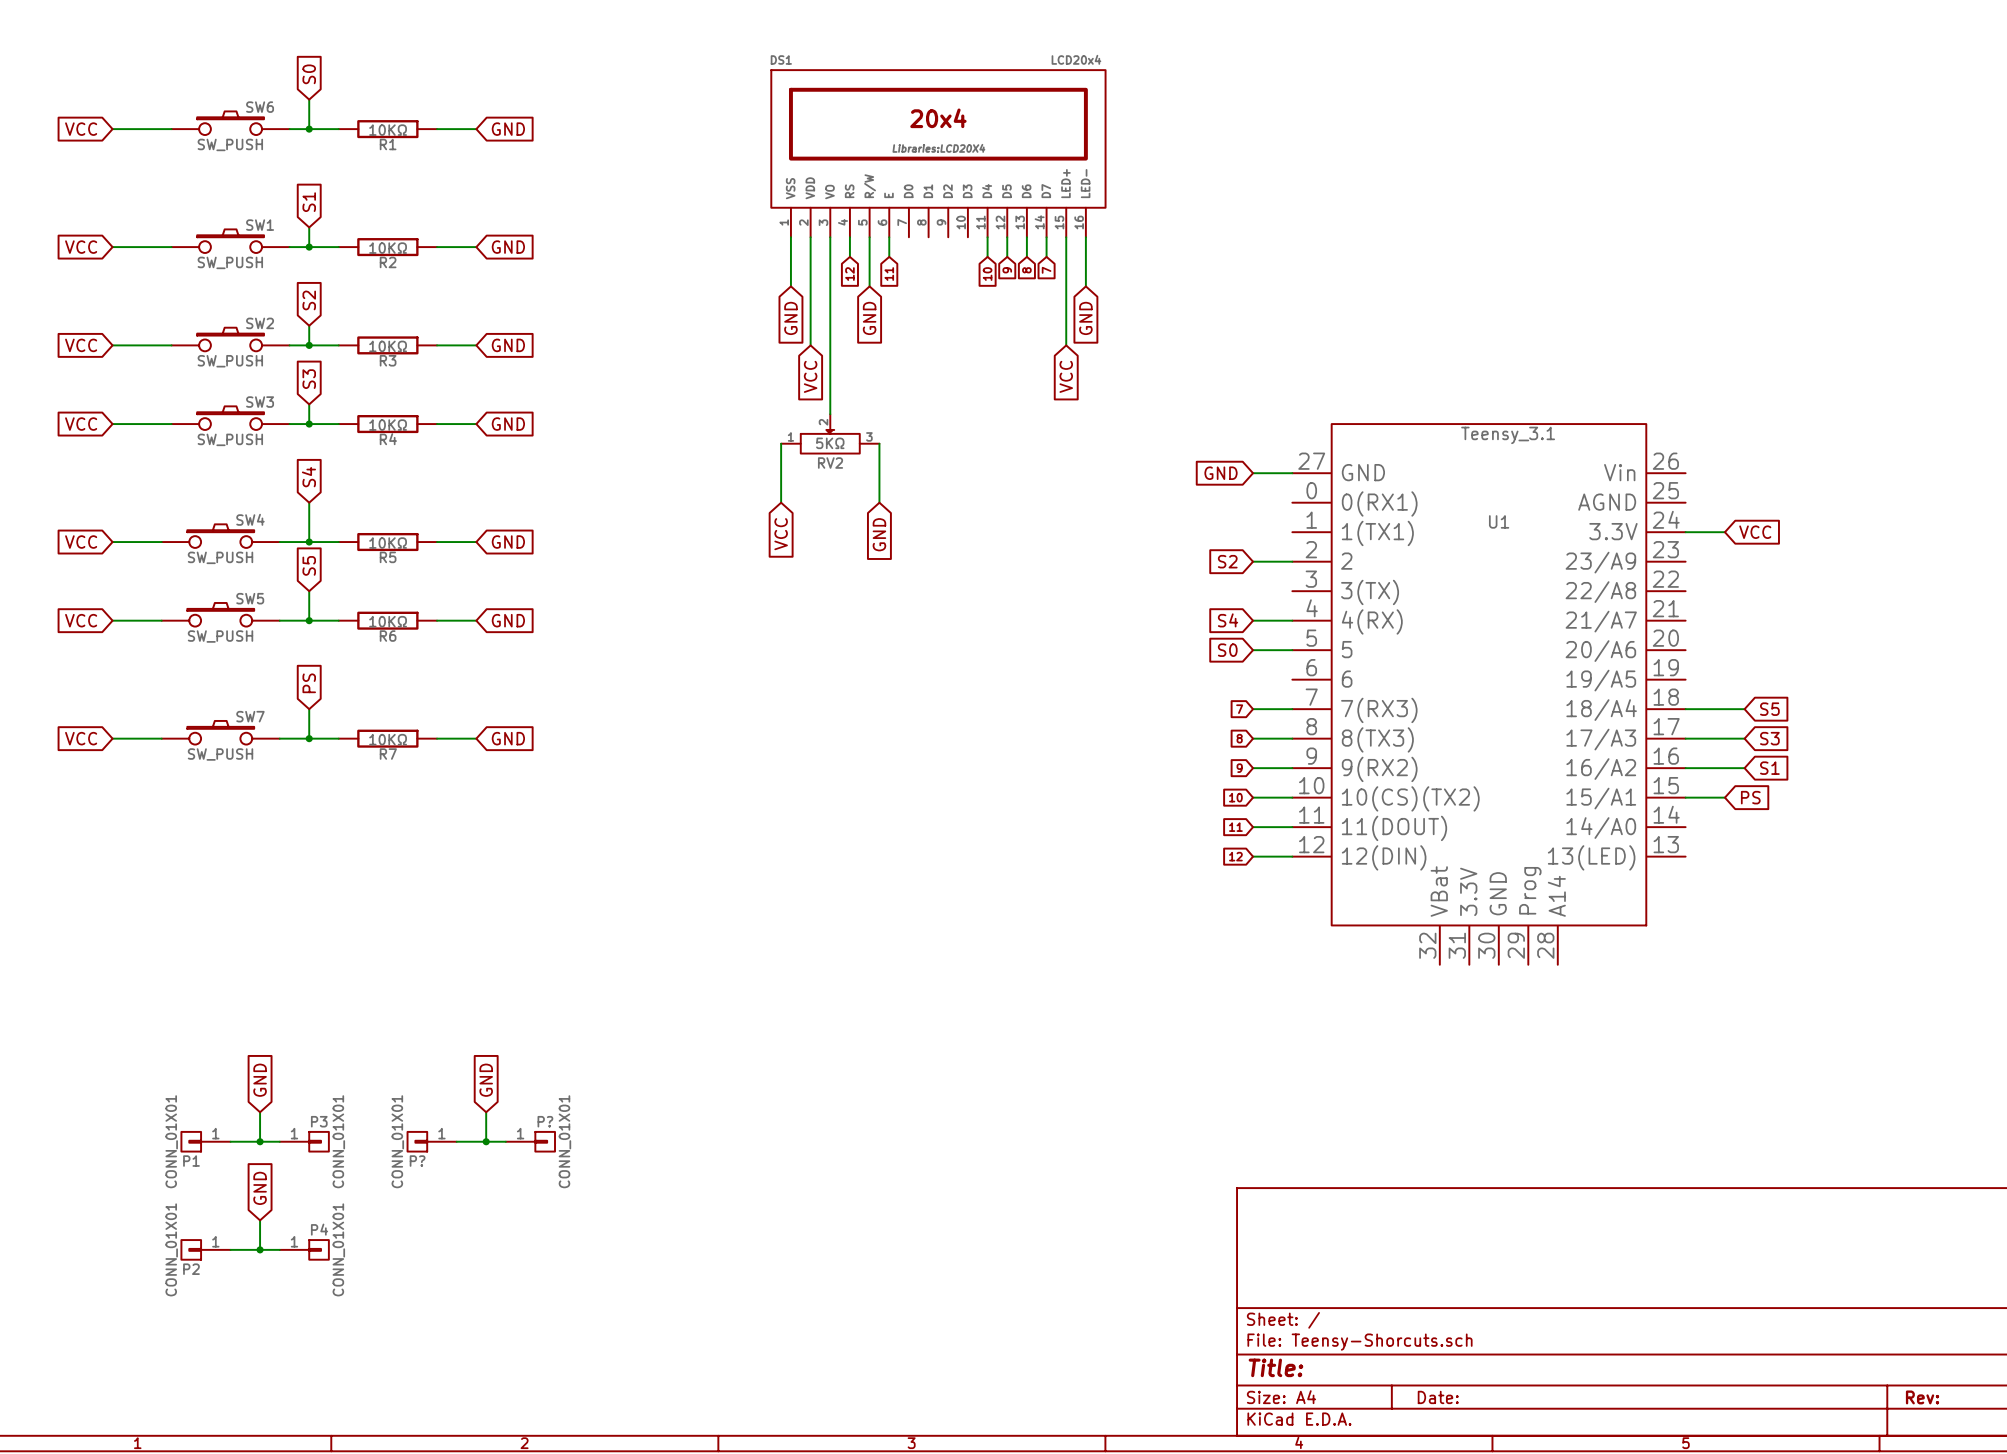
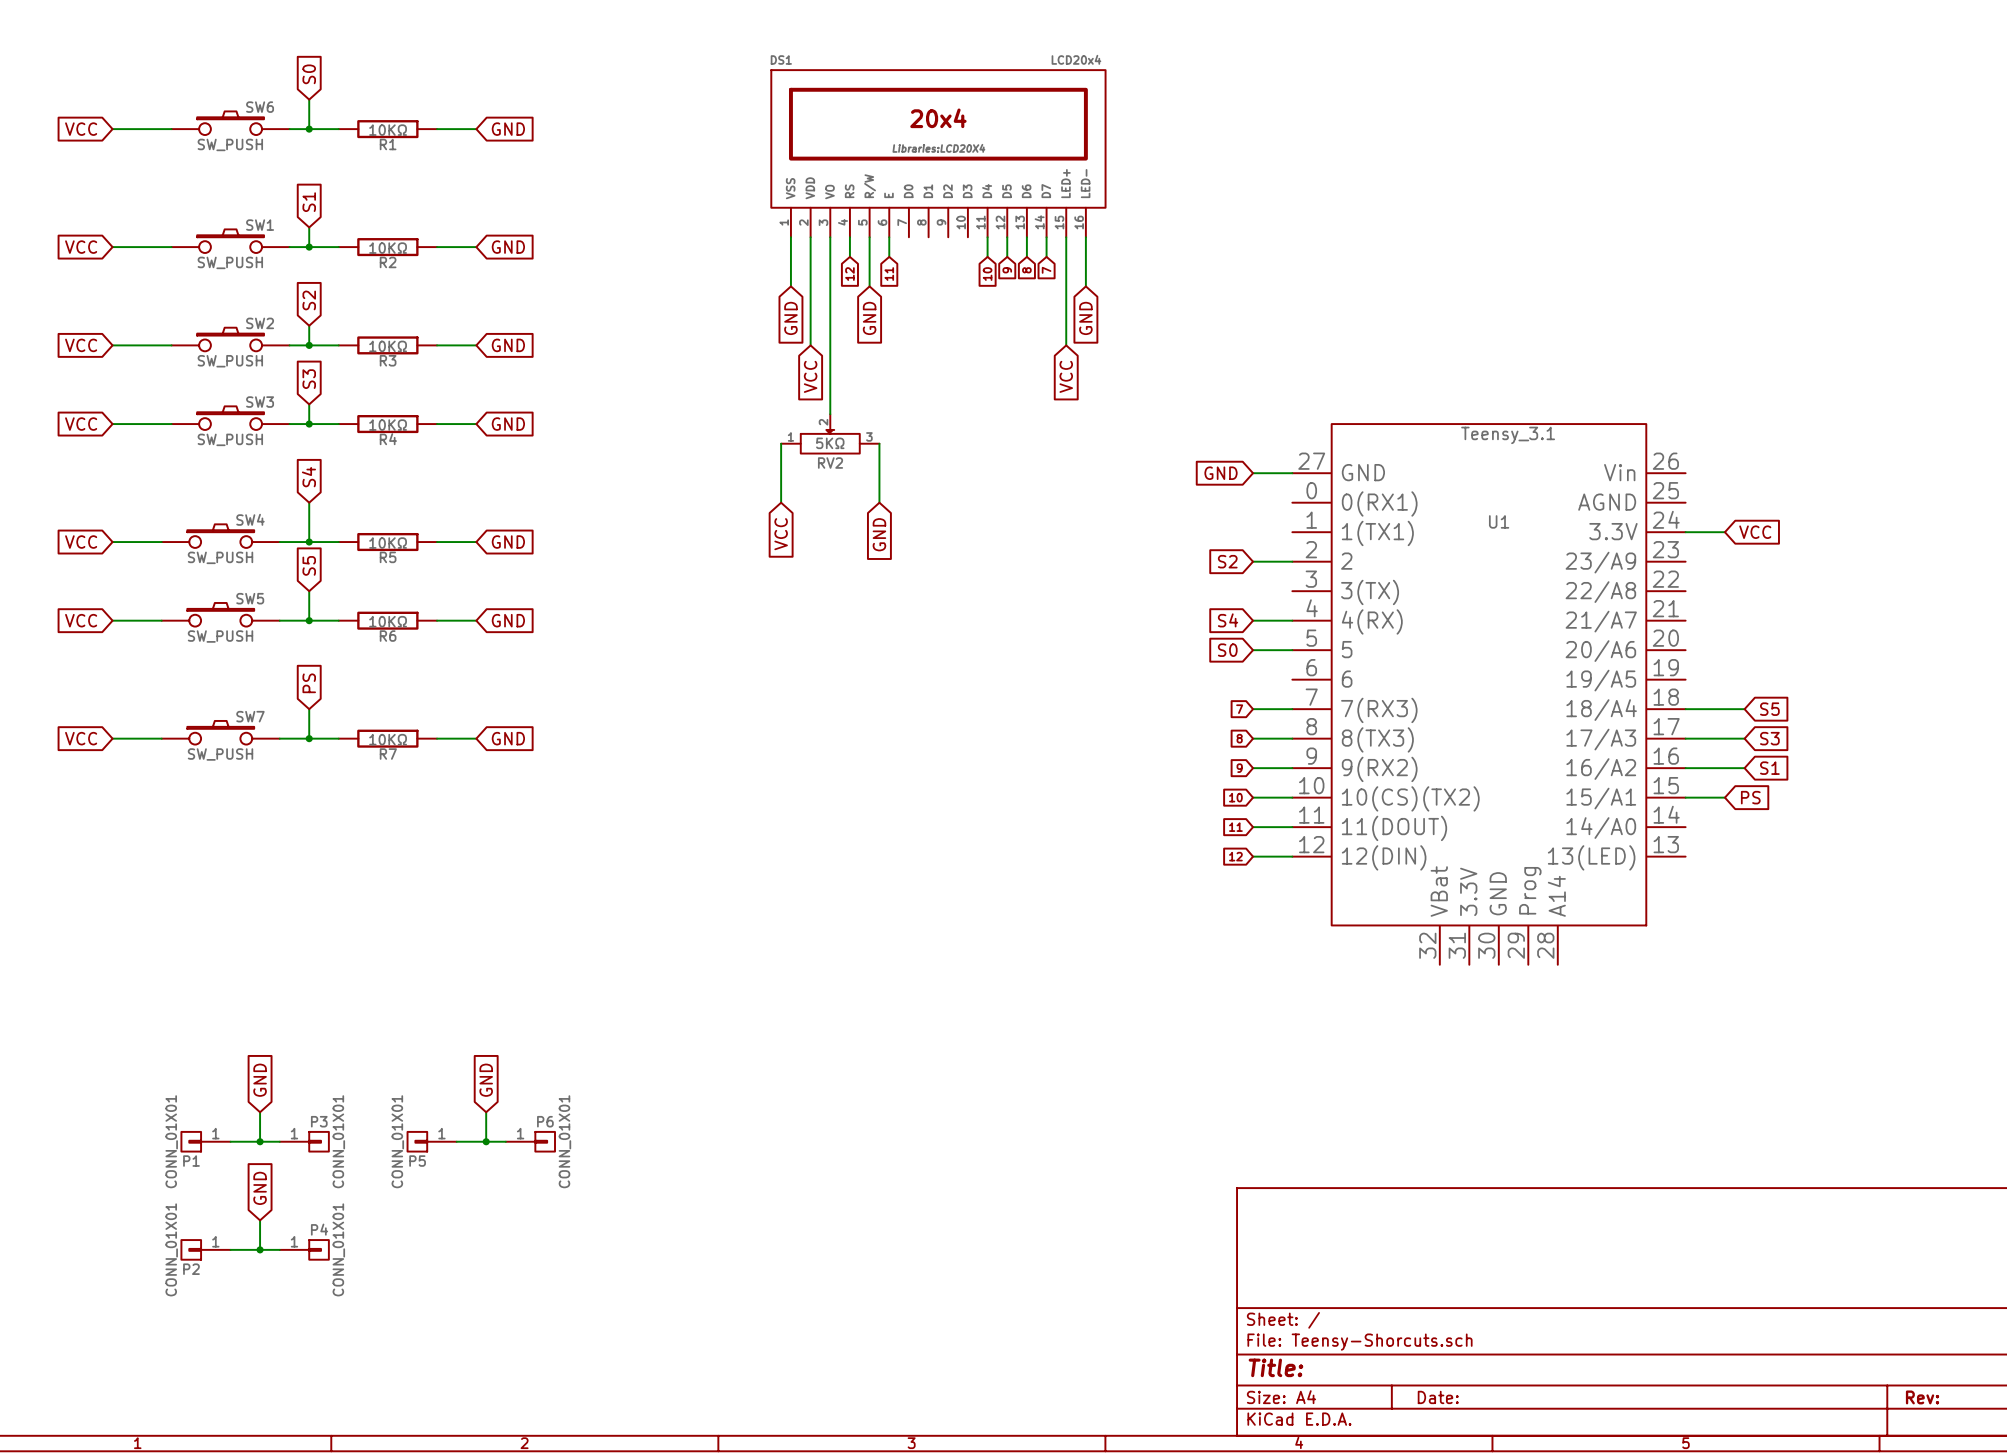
P? name: P? (545, 1121) -> P6 (545, 1121)
P? name: P? (417, 1161) -> P5 (417, 1161)

